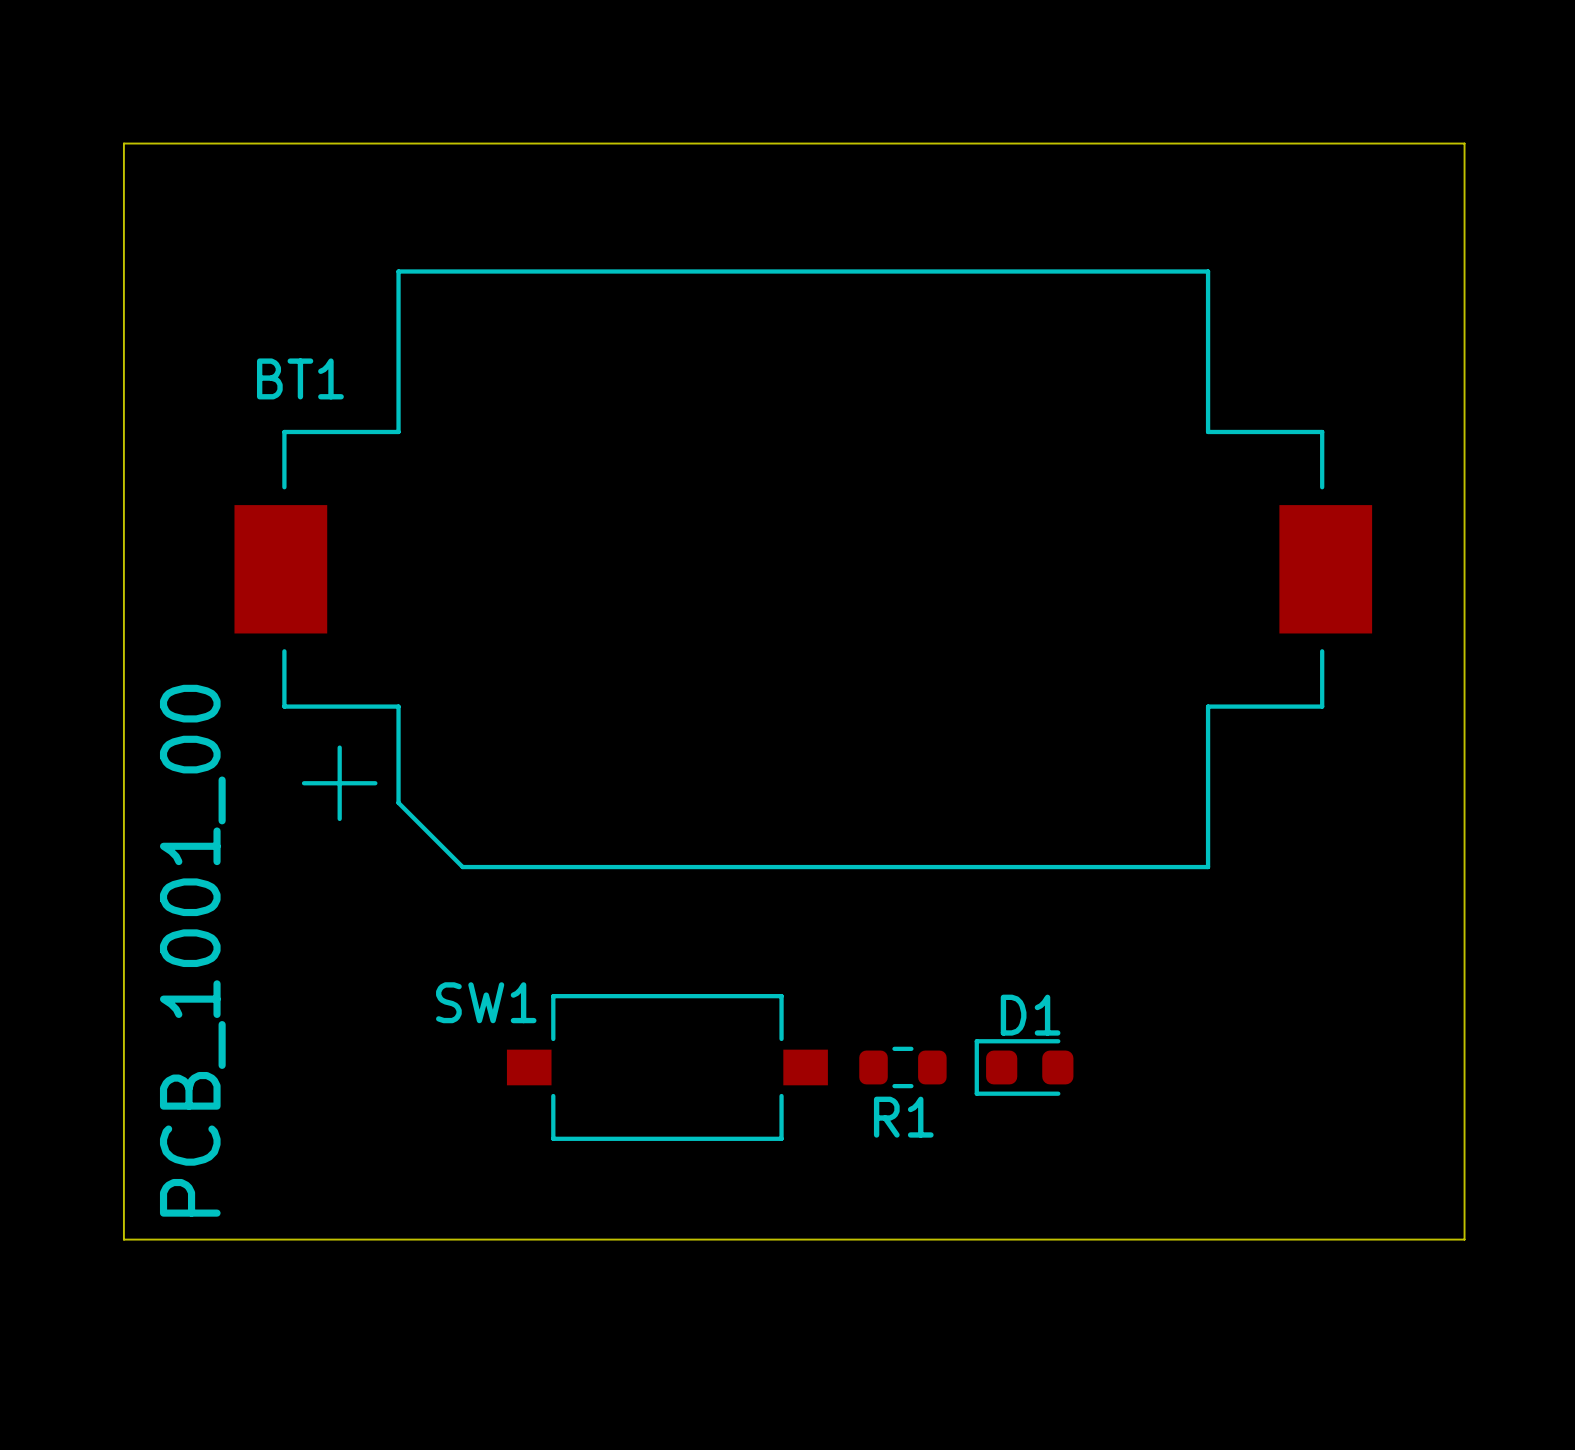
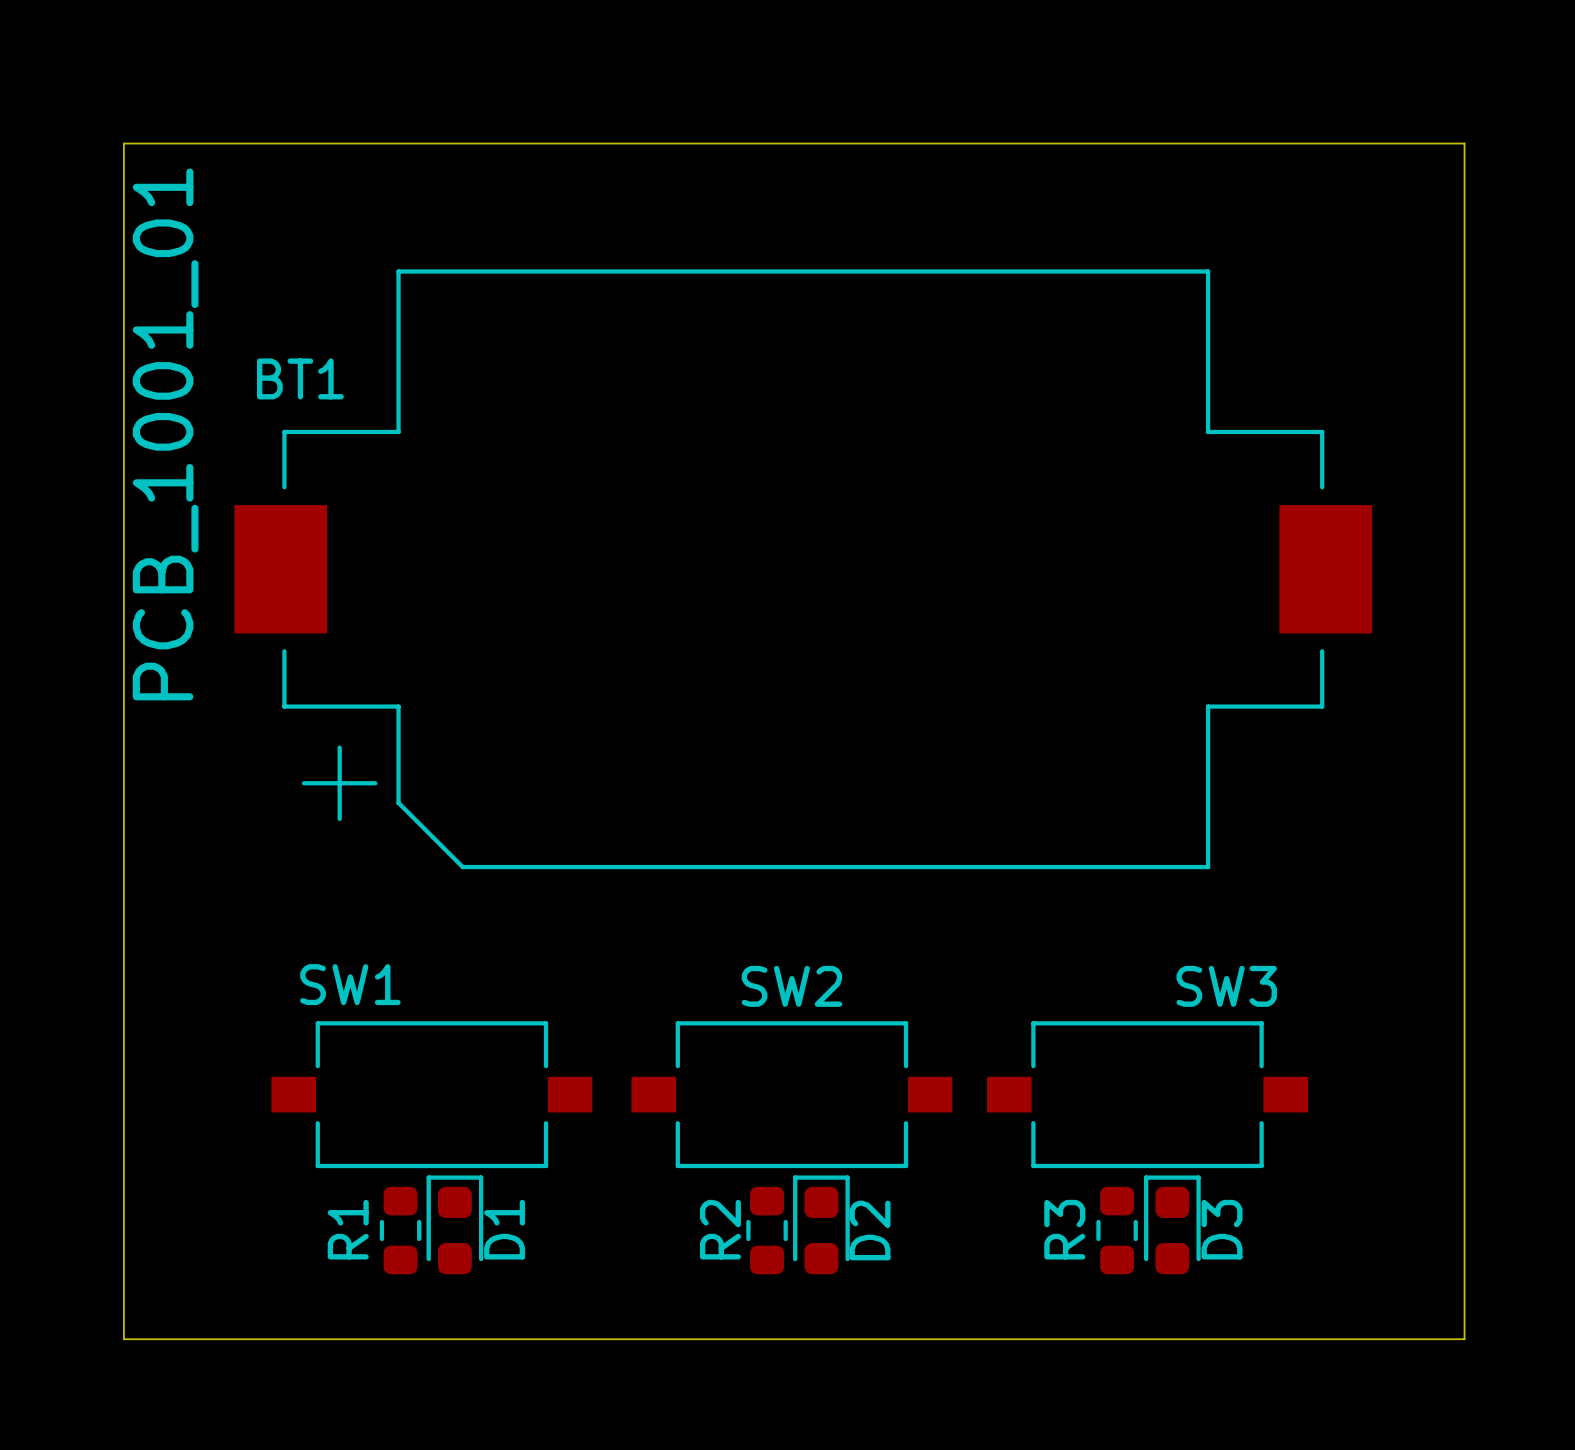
text: PCB_1001_00 (192, 950) -> PCB_1001_01 (165, 434)
SW1 name position: SW1 (486, 1002) -> SW1 (350, 984)
SW1 position: (667, 1067) -> (431, 1094)
R1 rotation: 0° (902, 1067) -> 90° clockwise (400, 1230)
R1 position: (902, 1067) -> (400, 1230)
D1 rotation: 0° (1024, 1067) -> 90° clockwise (454, 1224)
D1 position: (1024, 1067) -> (454, 1224)
SW2: none -> (791, 1094)
SW3: none -> (1147, 1094)
D2: none -> (821, 1224)
D3: none -> (1172, 1224)
R2: none -> (767, 1230)
R3: none -> (1117, 1230)
board edge: (123, 1239) (1464, 1239) -> (123, 1239) (123, 1339) (1464, 1339) (1464, 1239)

